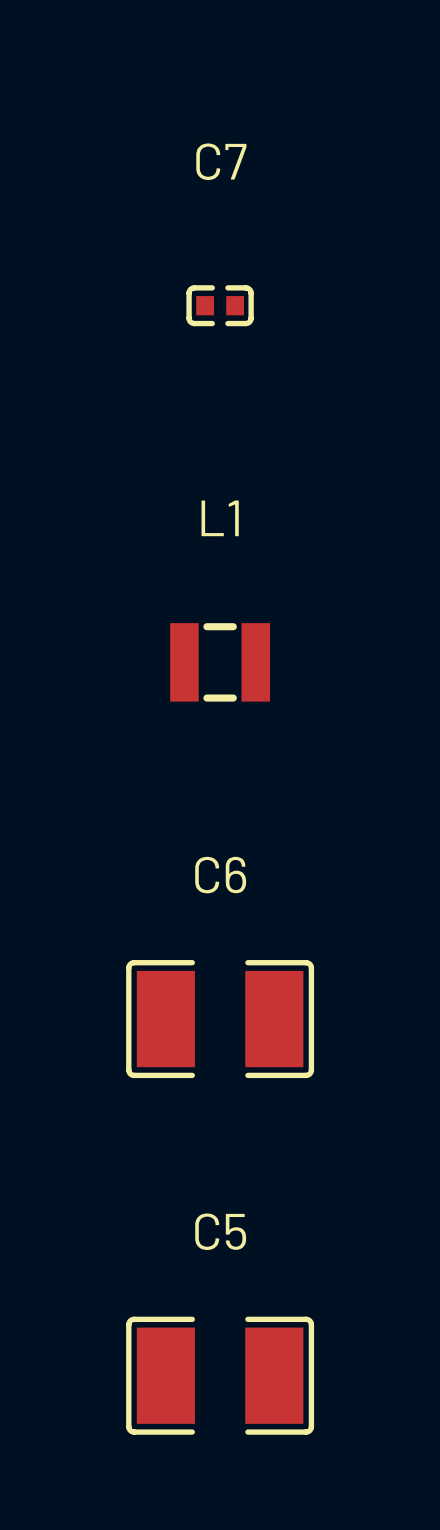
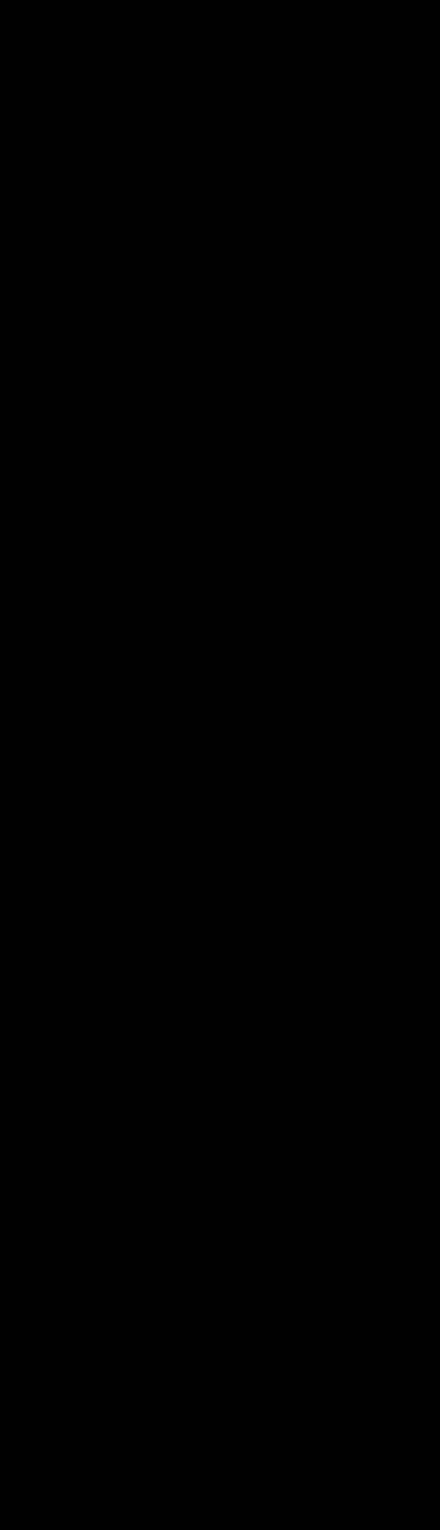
C7: (220, 305) -> none
L1: (220, 662) -> none
C6: (220, 1019) -> none
C5: (220, 1375) -> none

